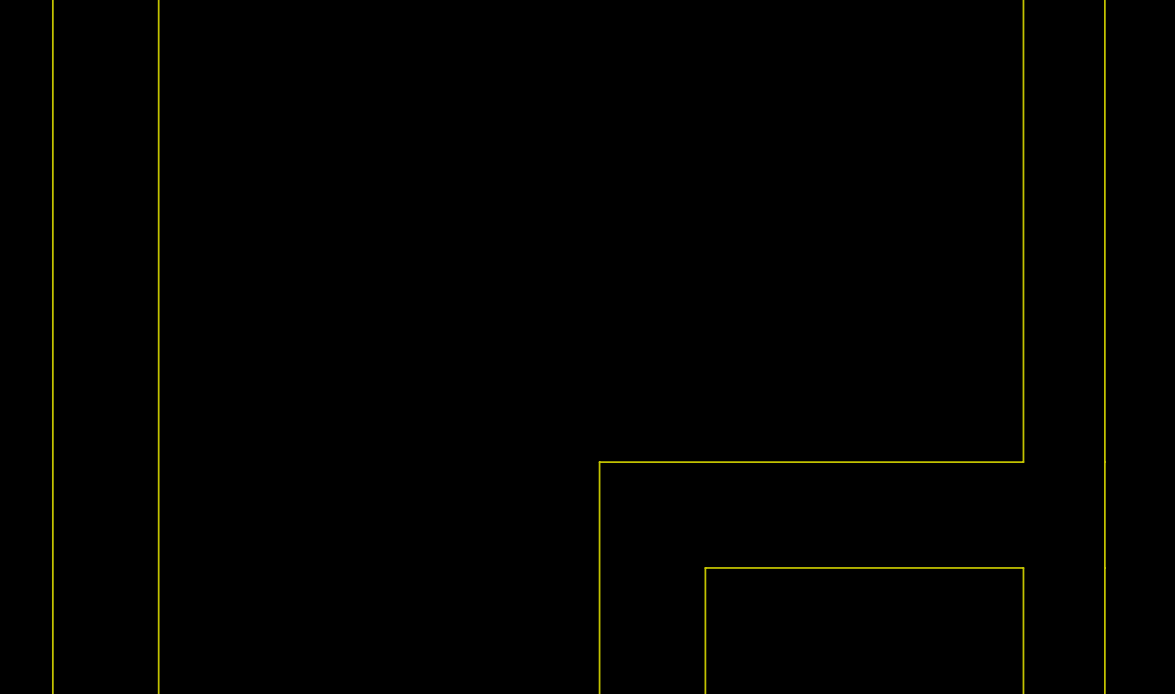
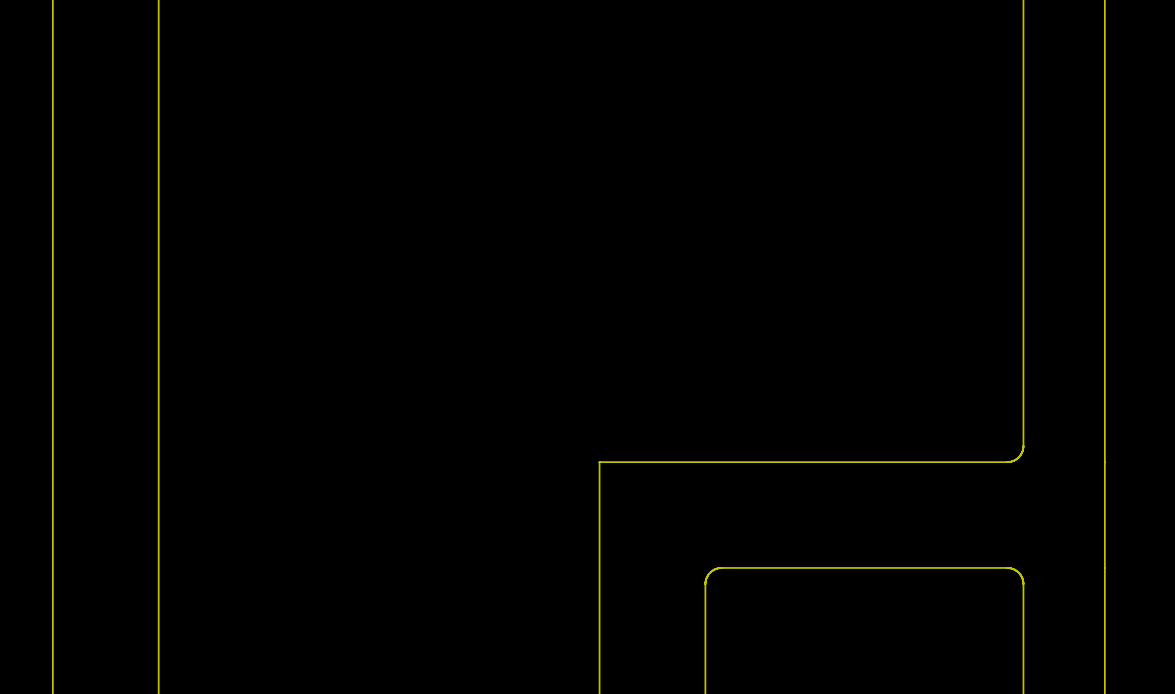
board edge: (1023, 445) (1023, 462) (1007, 462) -> none
board edge: (721, 567) (705, 567) (705, 584) -> none
board edge: (1007, 567) (1023, 567) (1023, 584) -> none

